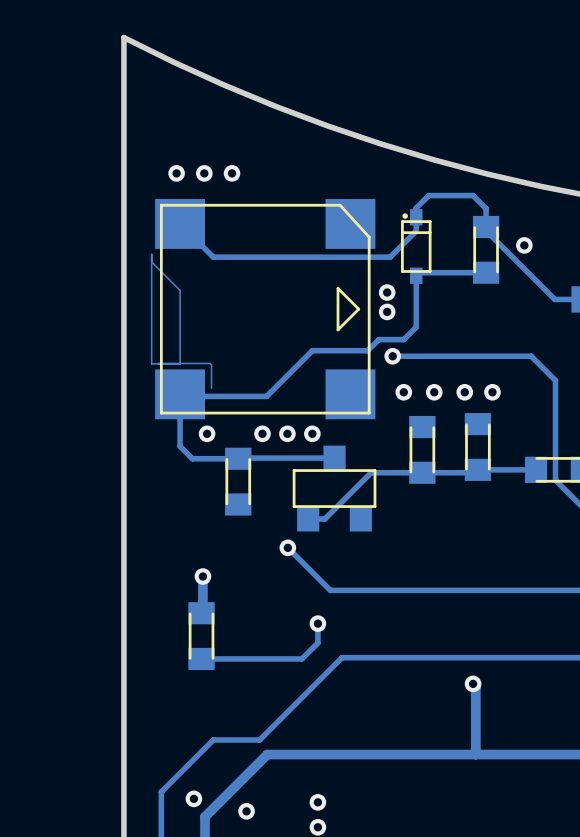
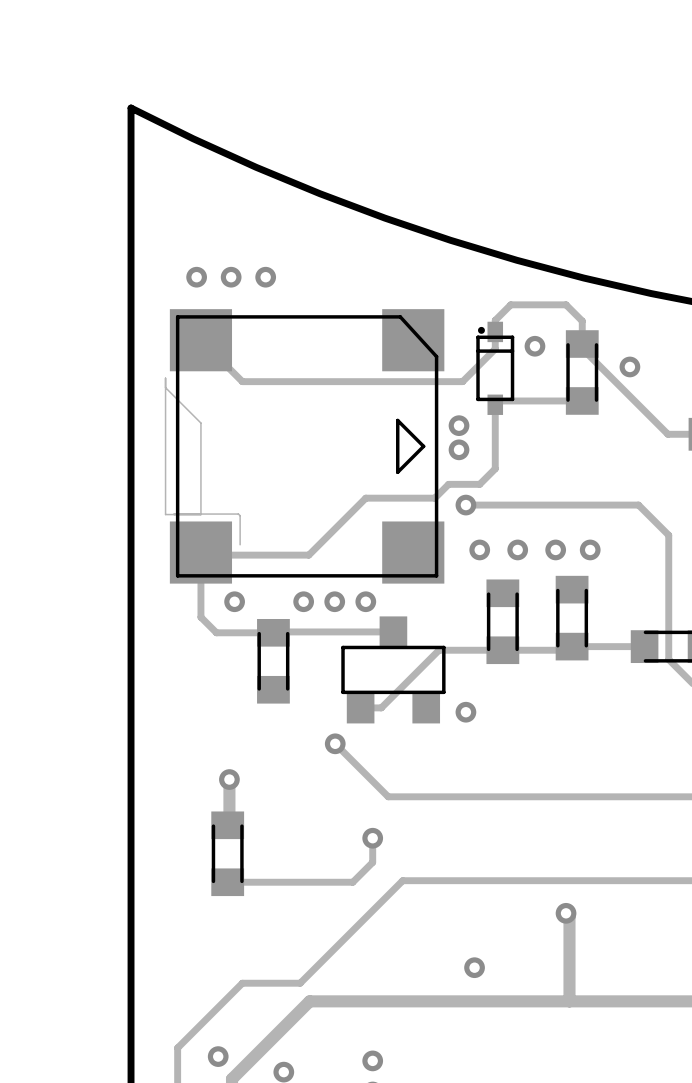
via: none -> (534, 346)
via: none -> (465, 712)
via: none -> (474, 967)

